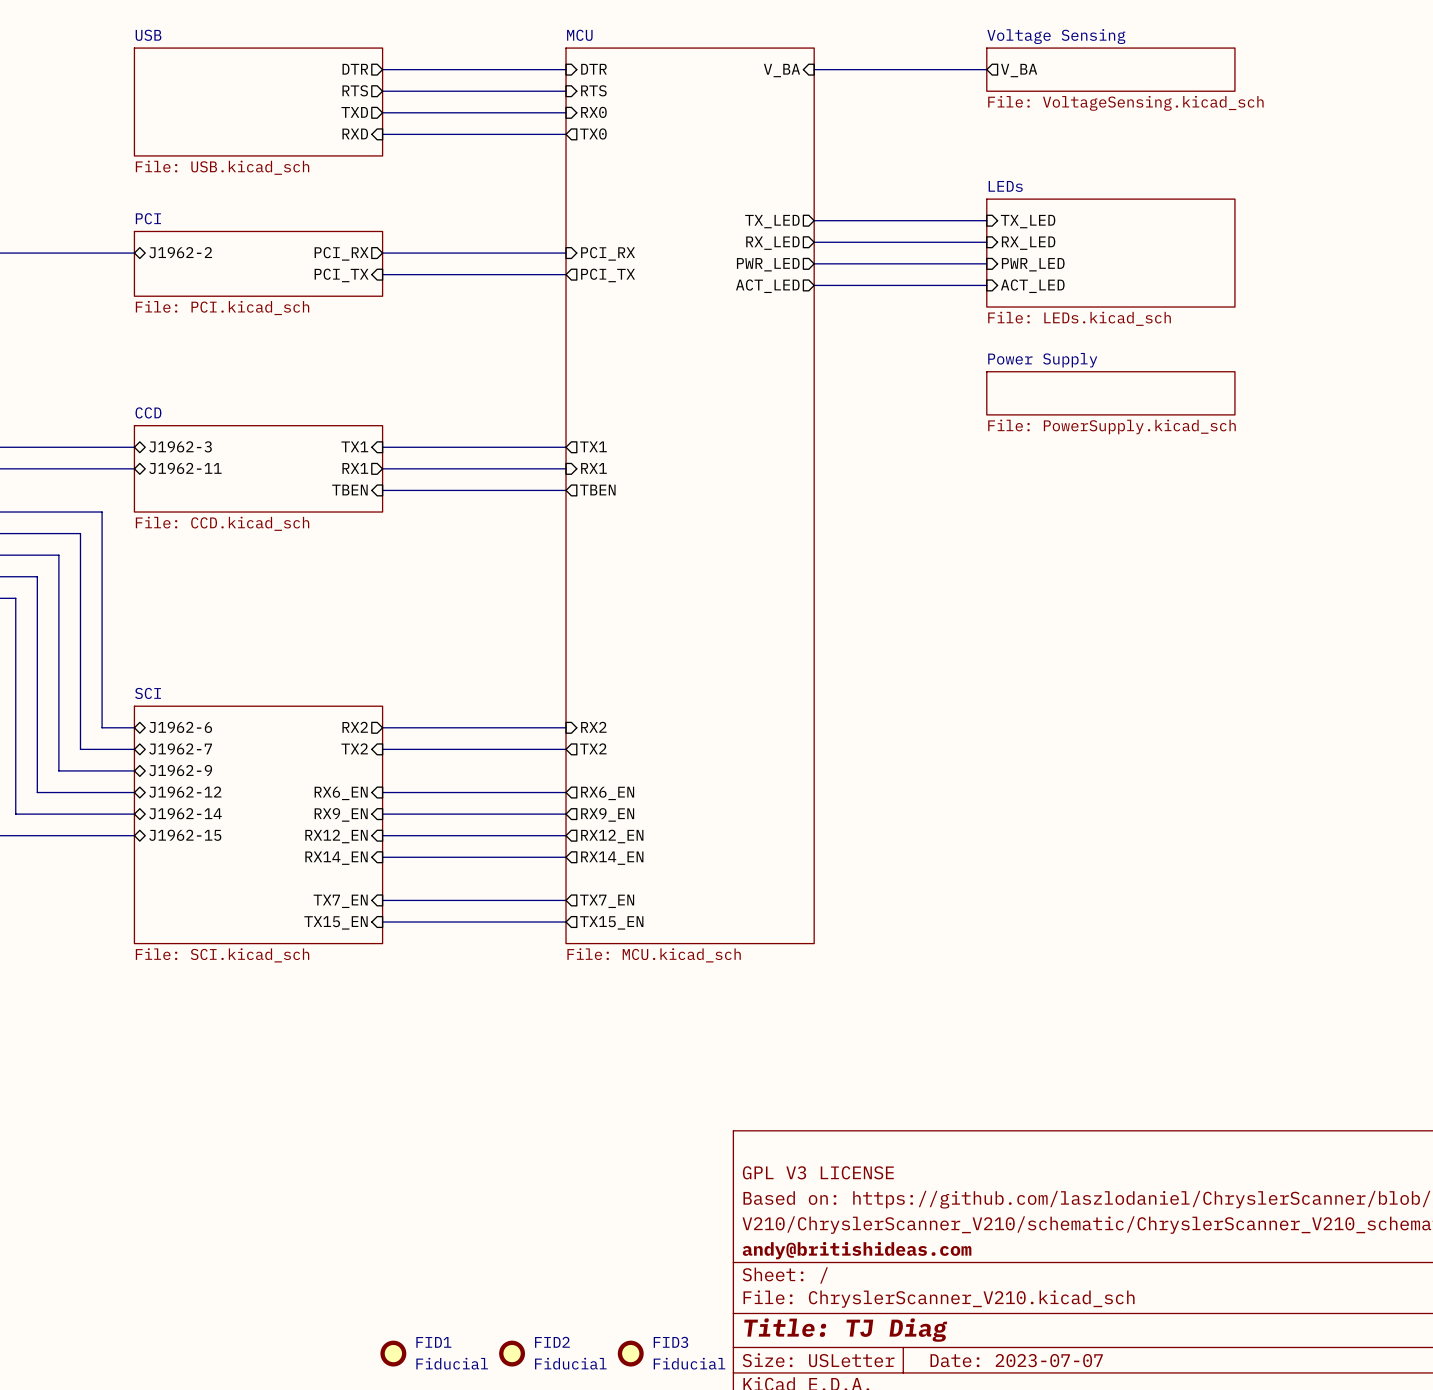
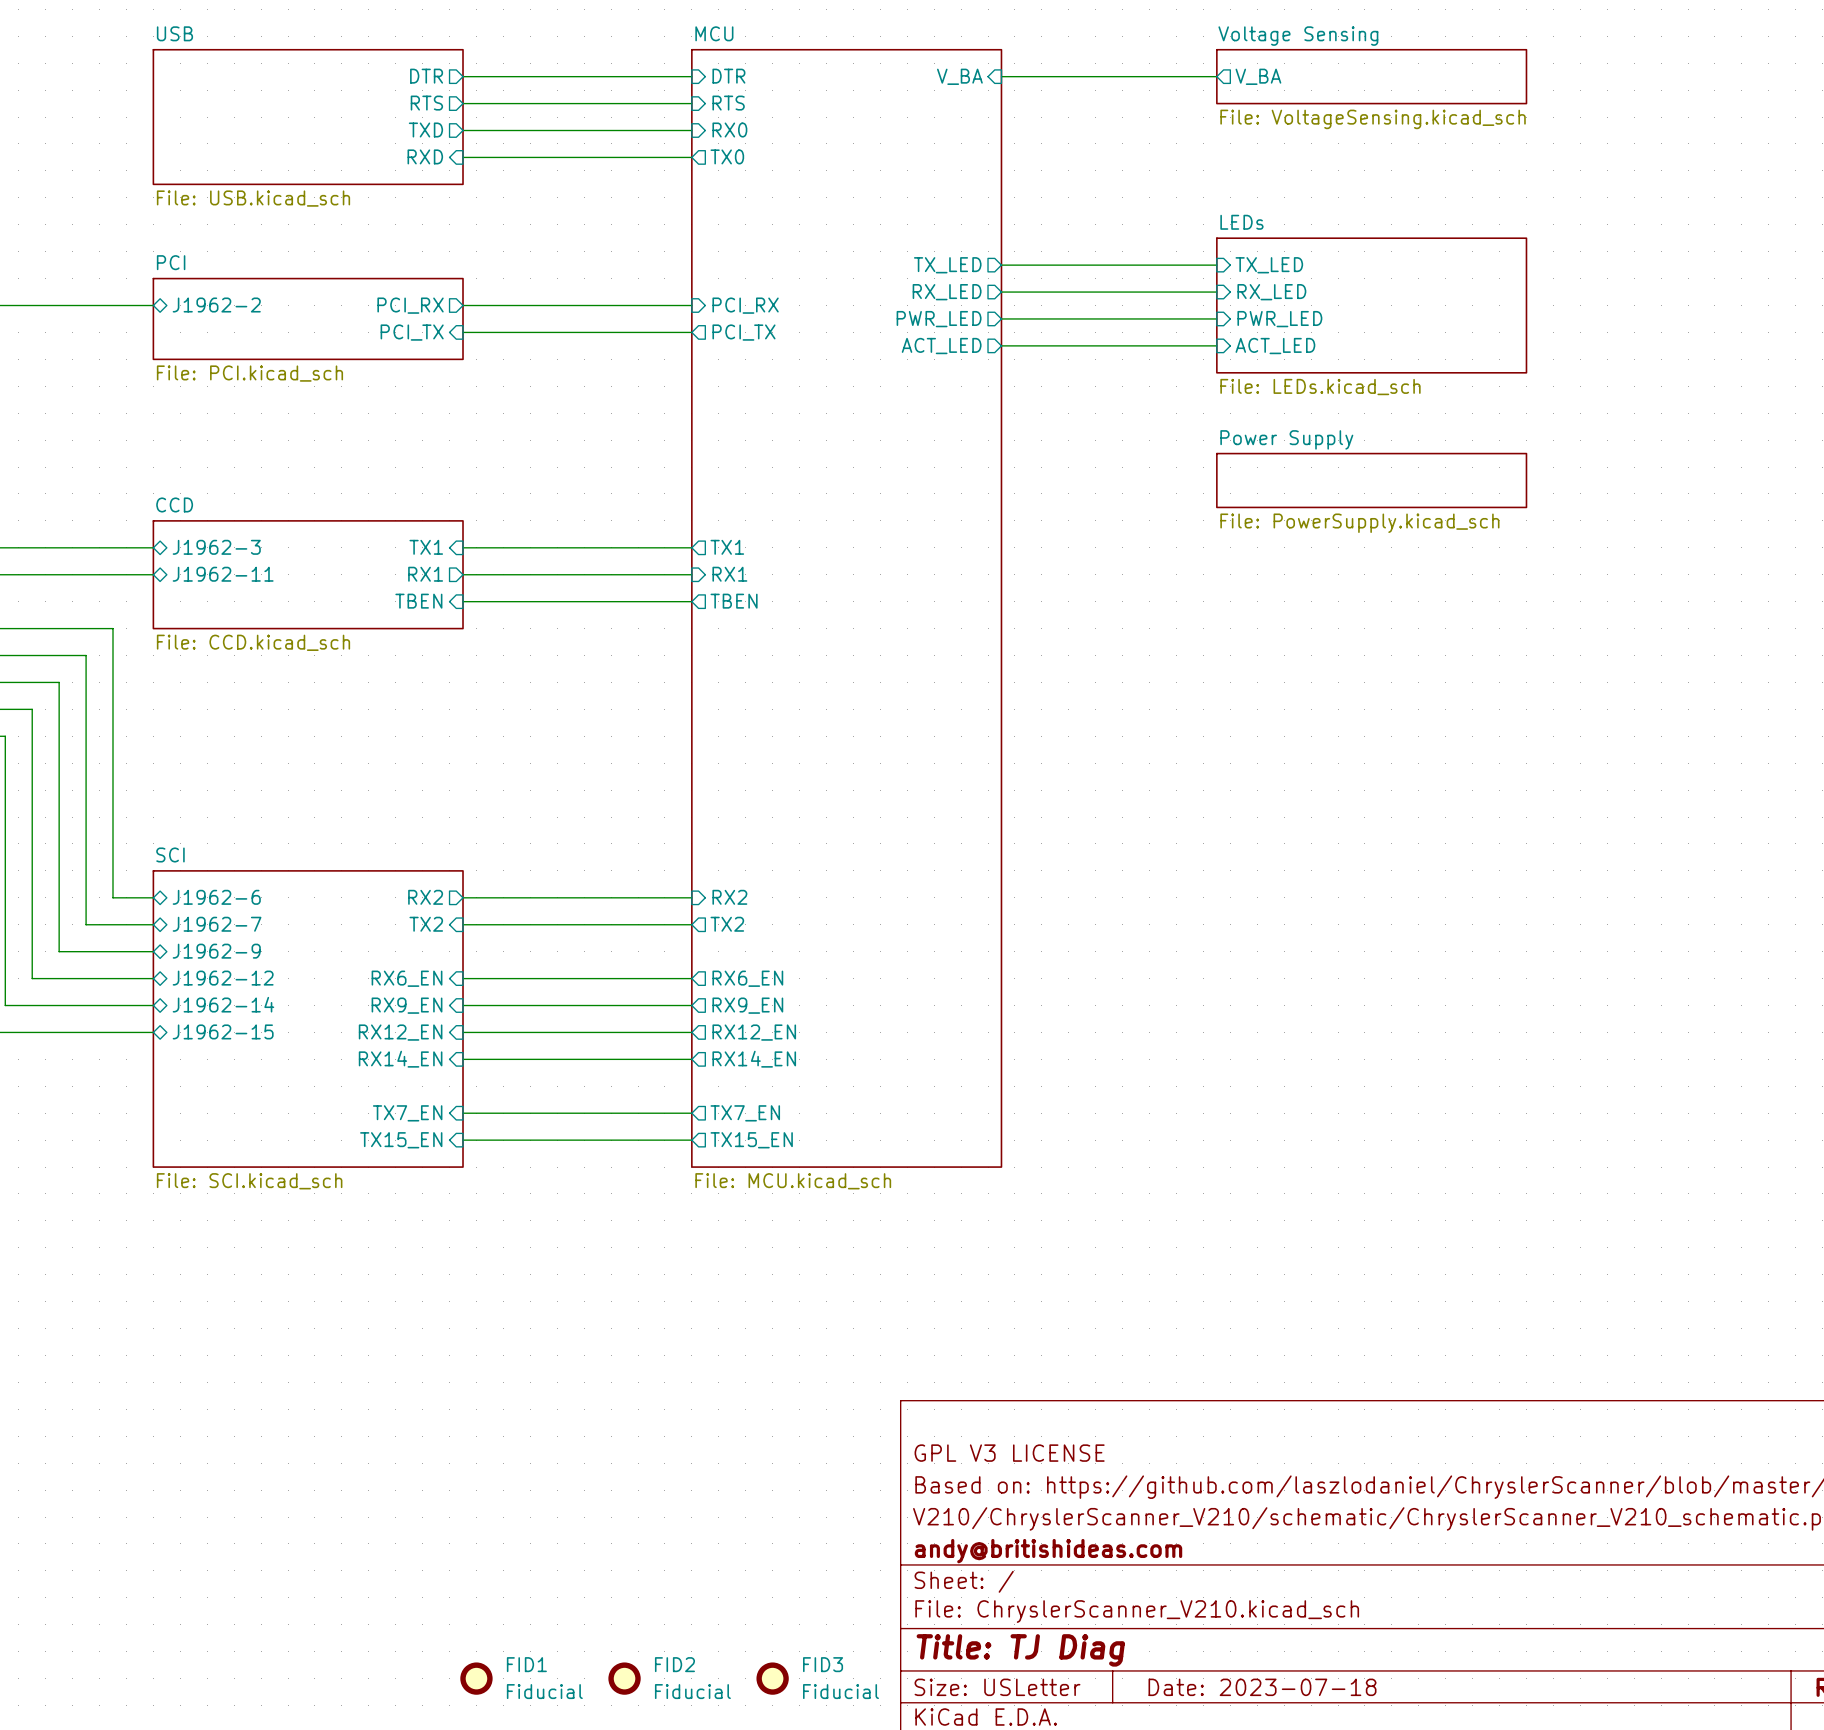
title block: Date: 2023-07-07 (1016, 1360) -> Date: 2023-07-18 (1262, 1687)

